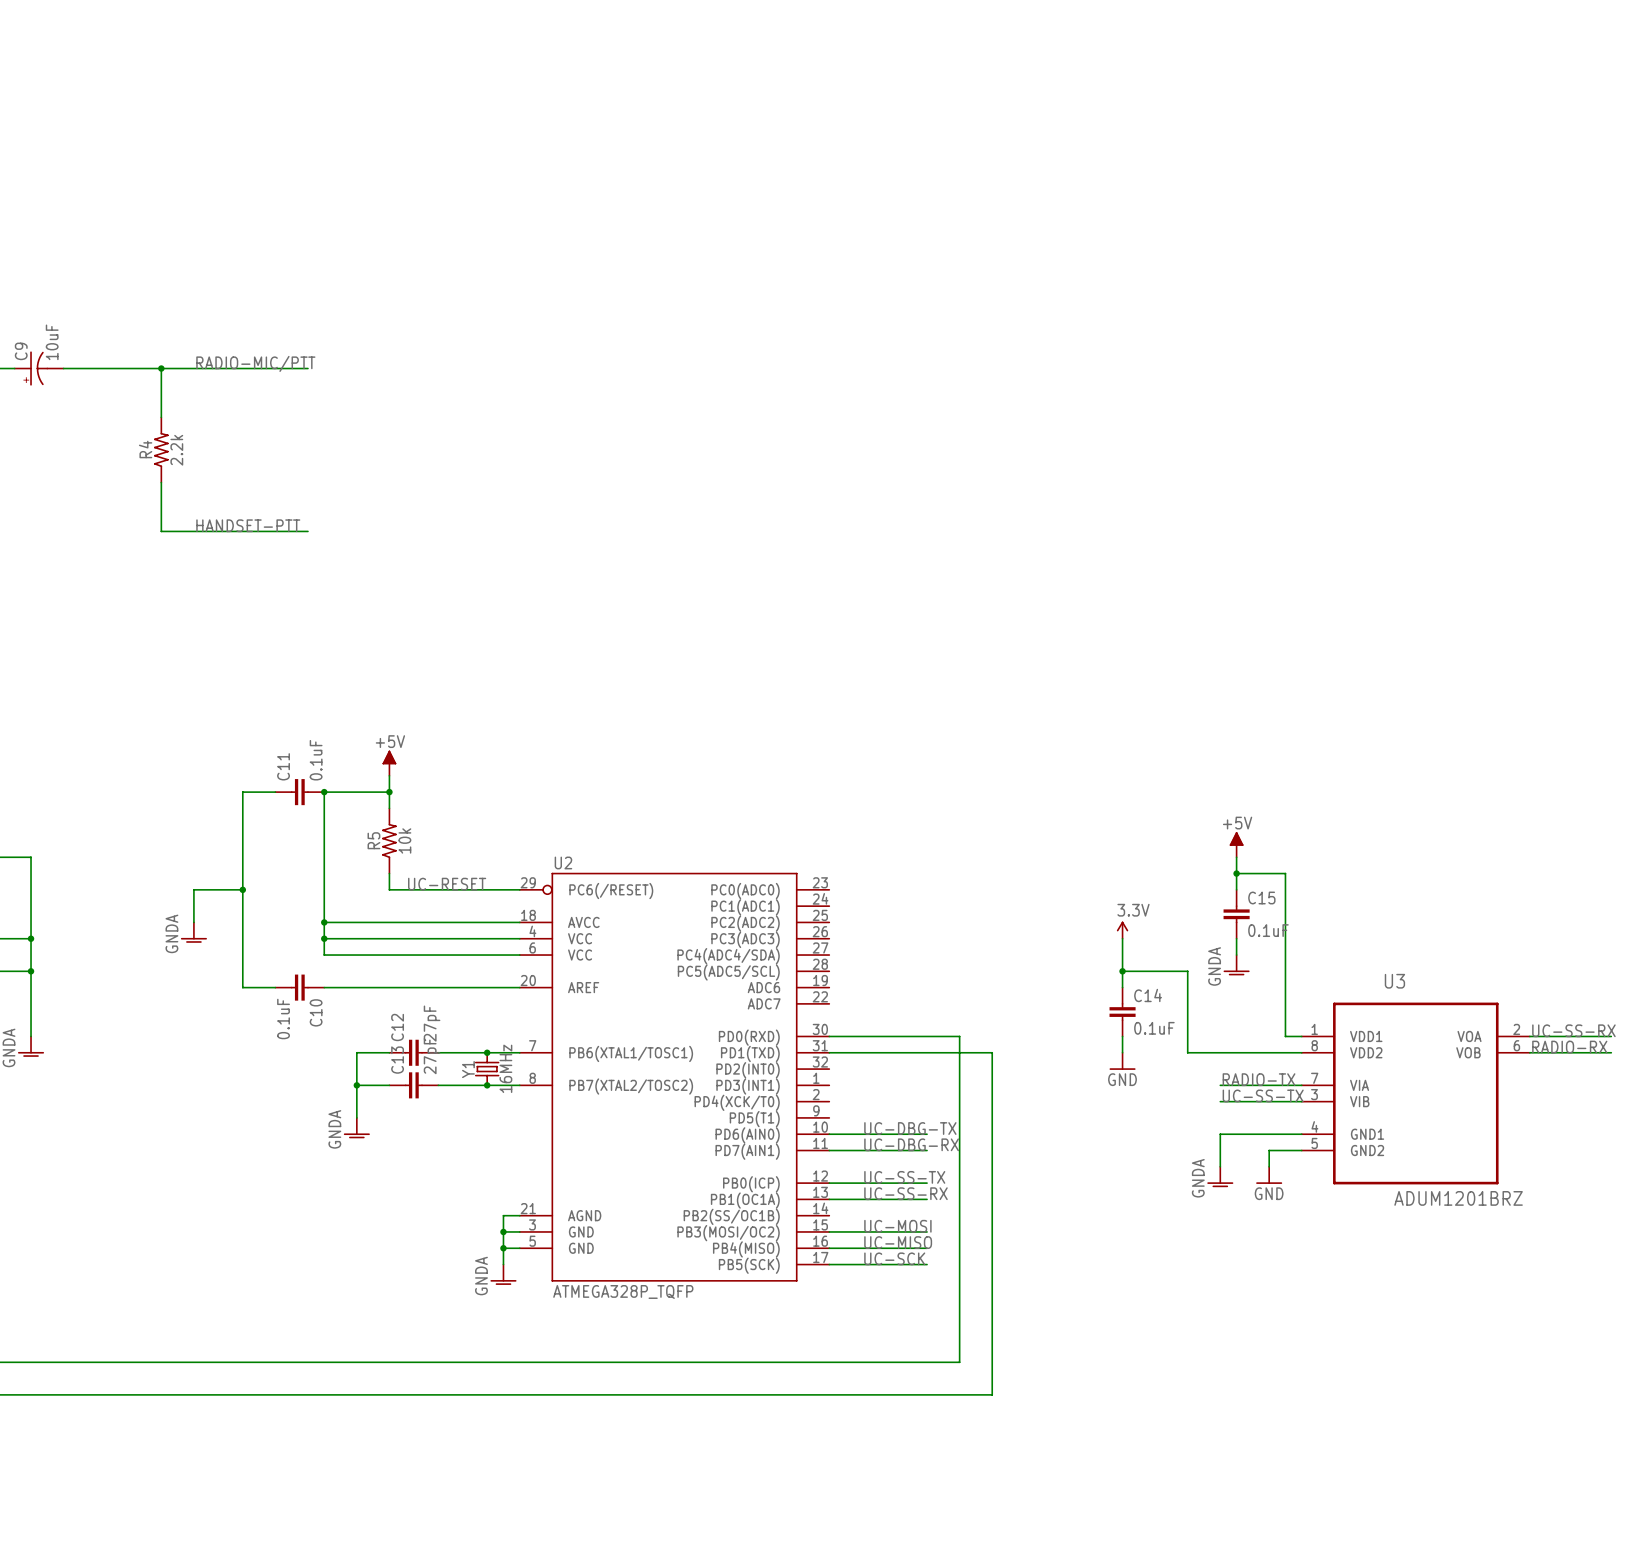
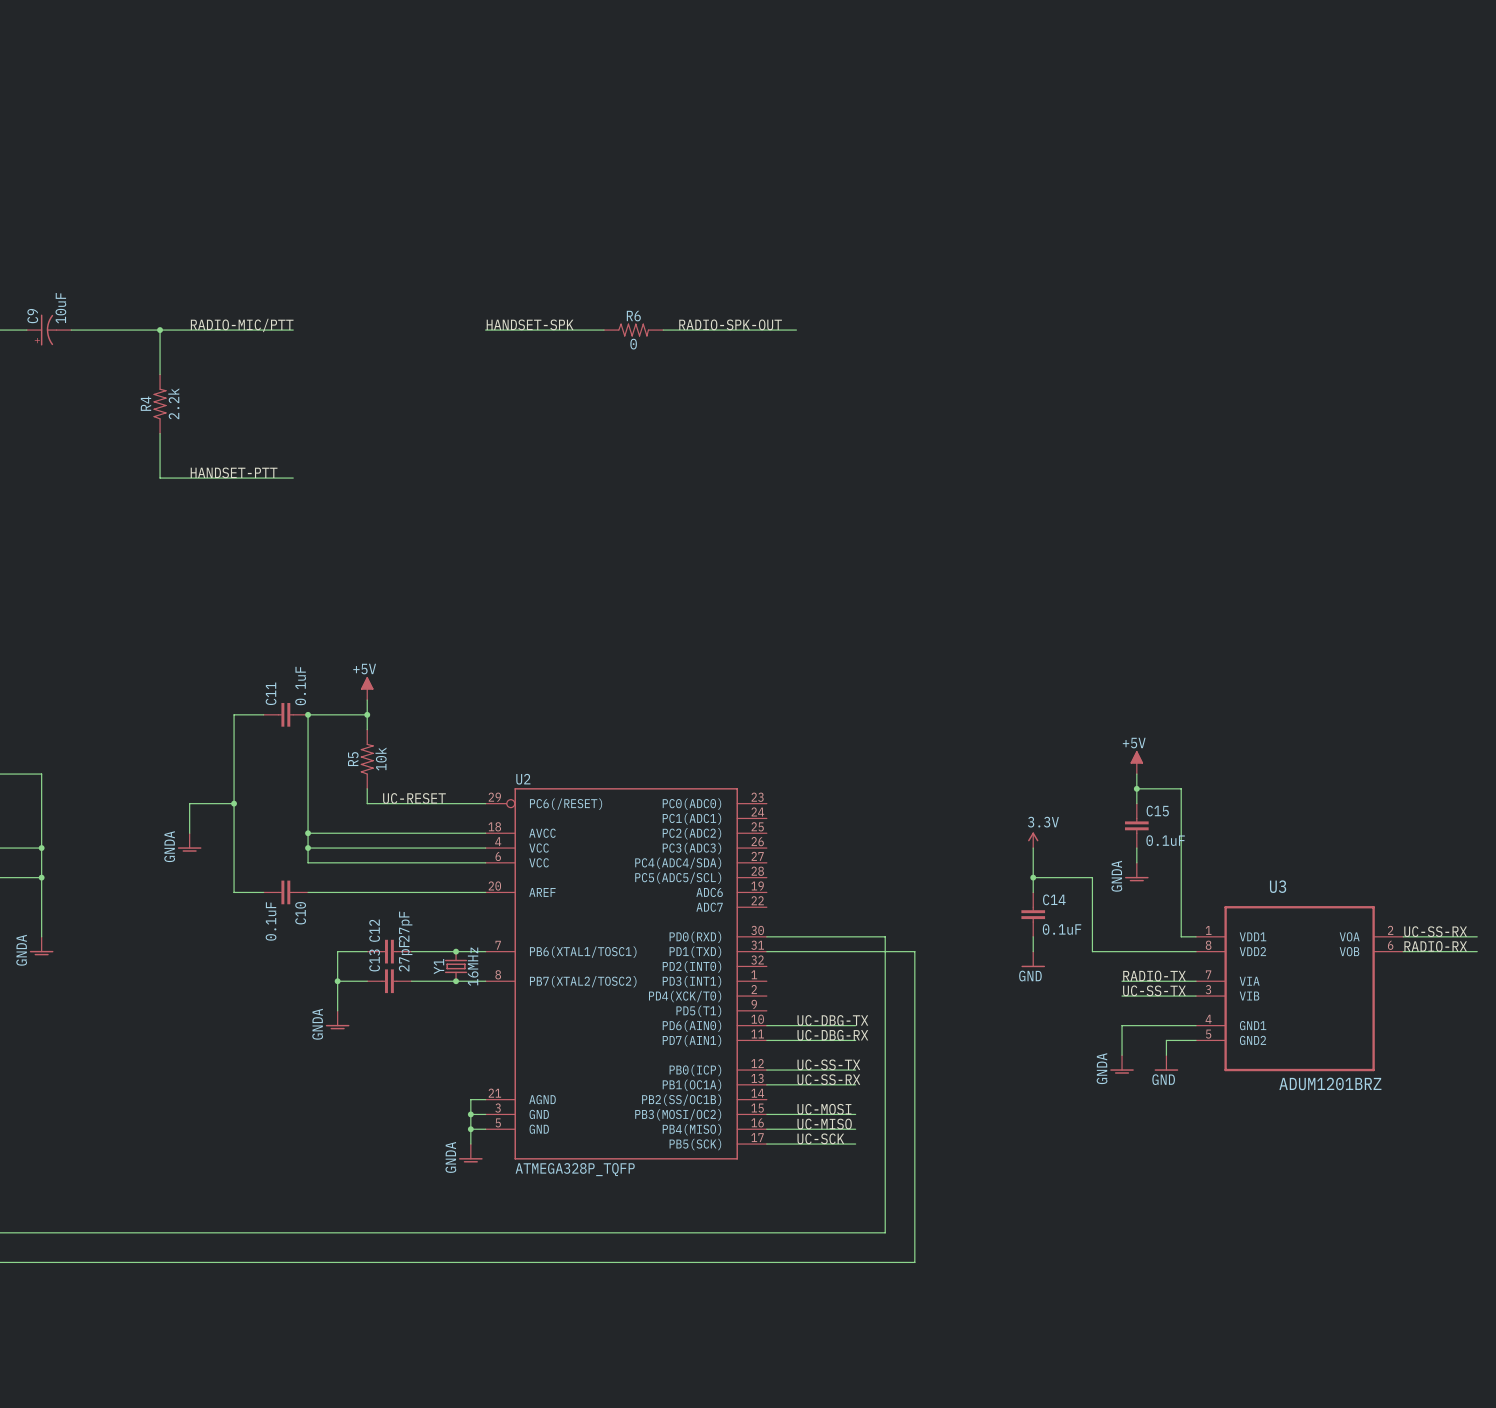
label: none -> HANDSET-SPK (530, 324)
label: none -> RADIO-SPK-OUT (730, 324)
wire: none -> (485, 330) (604, 330)
R6: none -> 0 (633, 330)
wire: none -> (663, 330) (796, 330)

